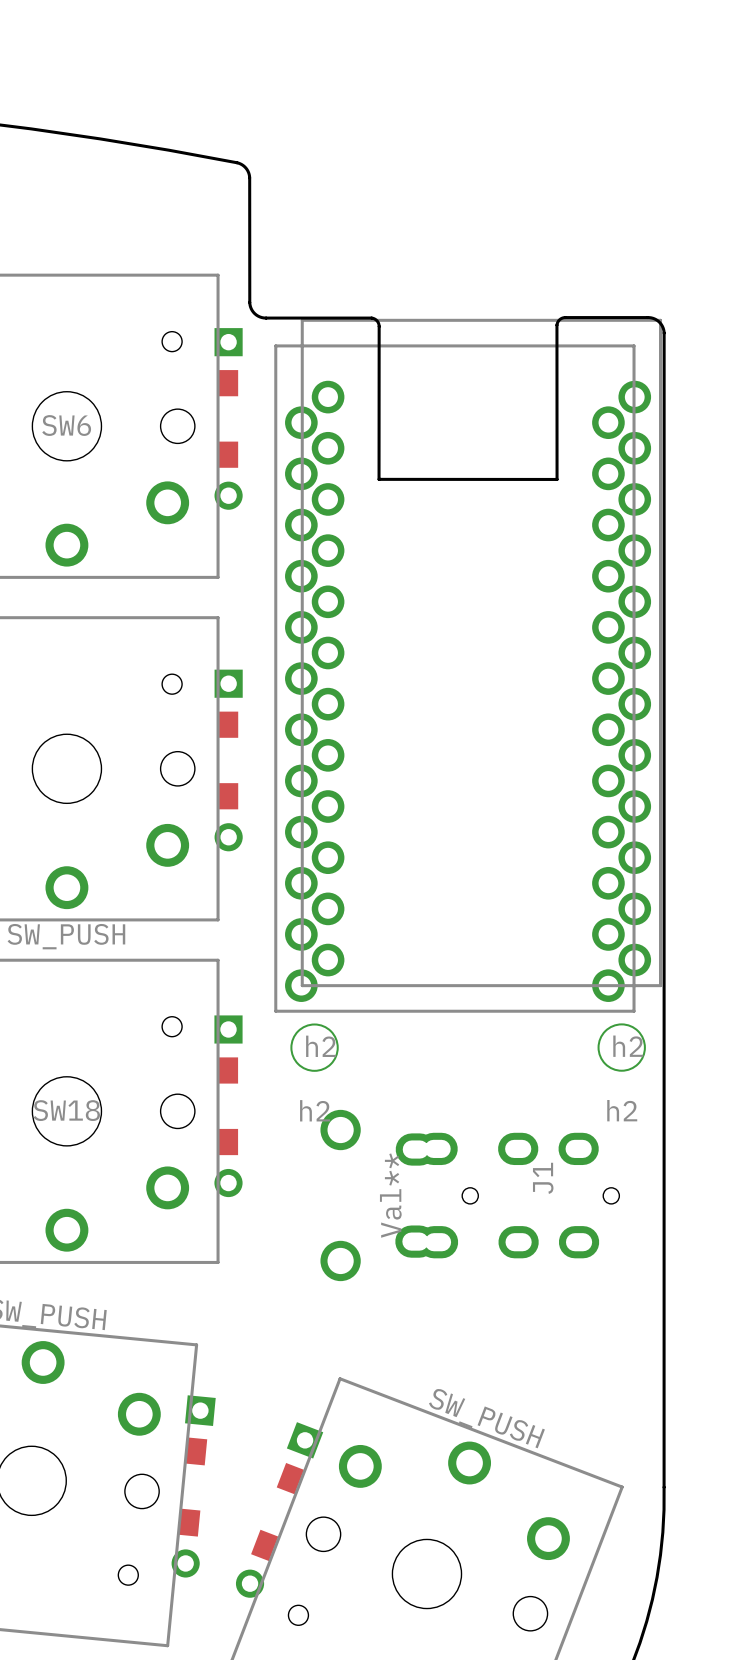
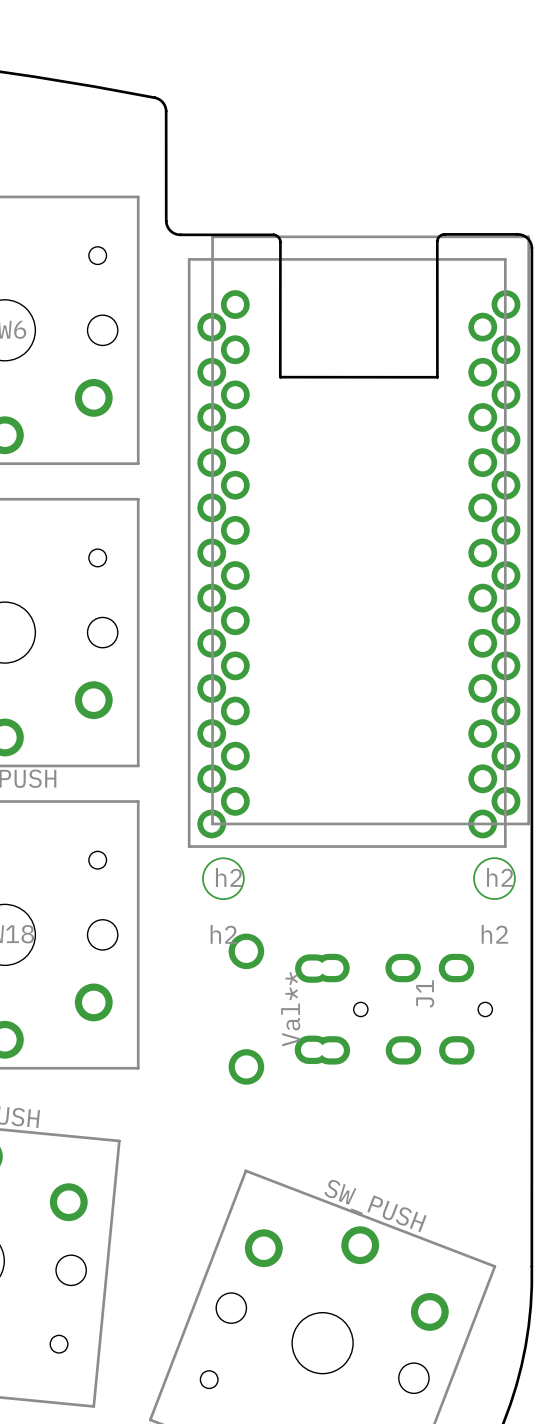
part: (228, 418) -> none
part: (228, 760) -> none
part: (228, 1106) -> none
part: (193, 1486) -> none
part: (279, 1509) -> none

